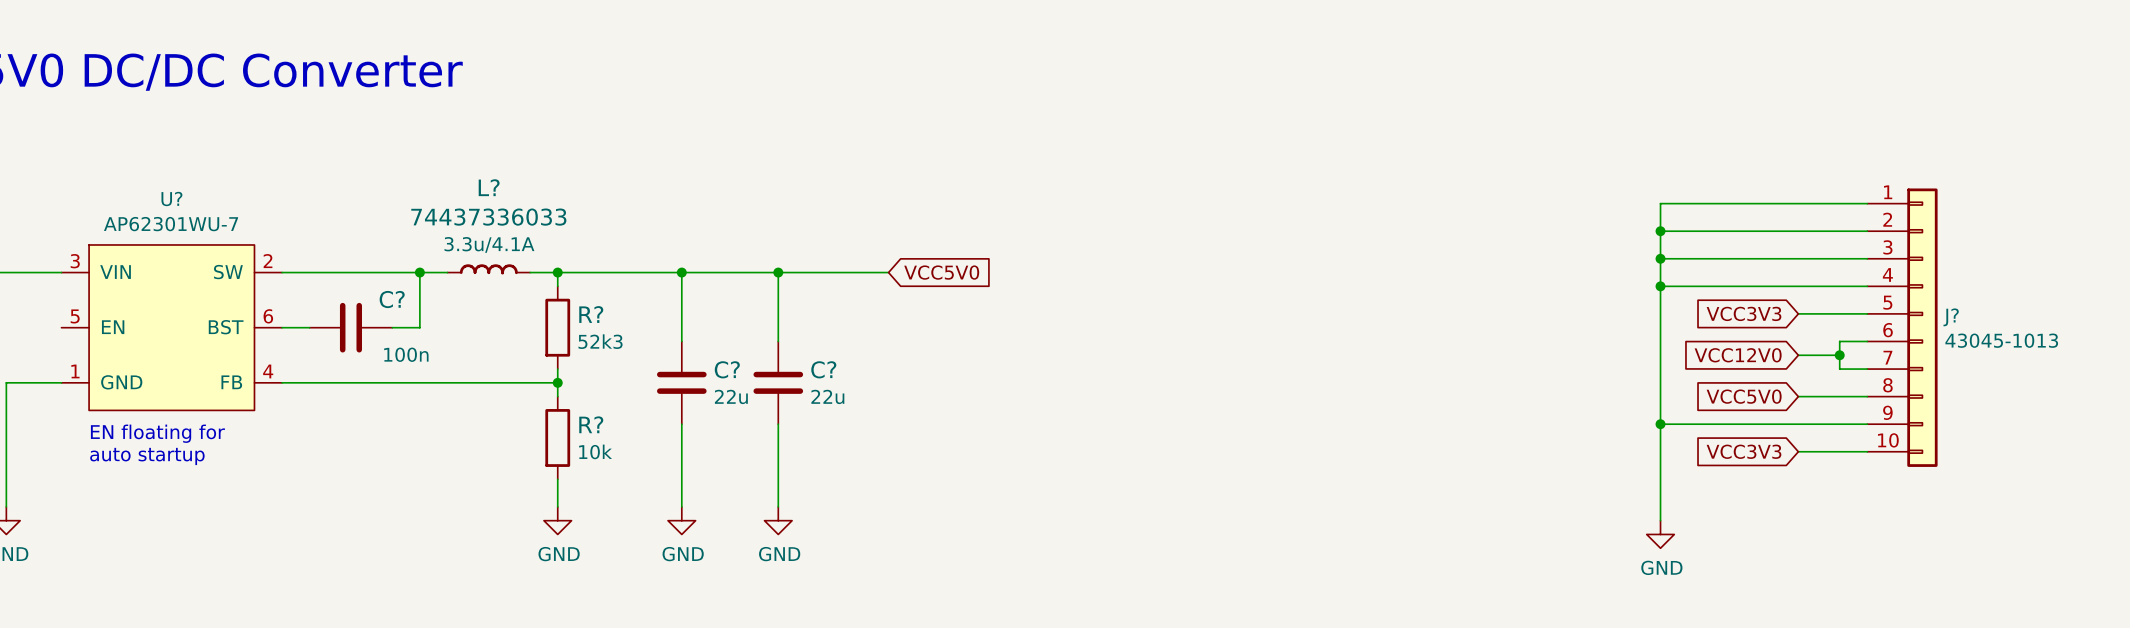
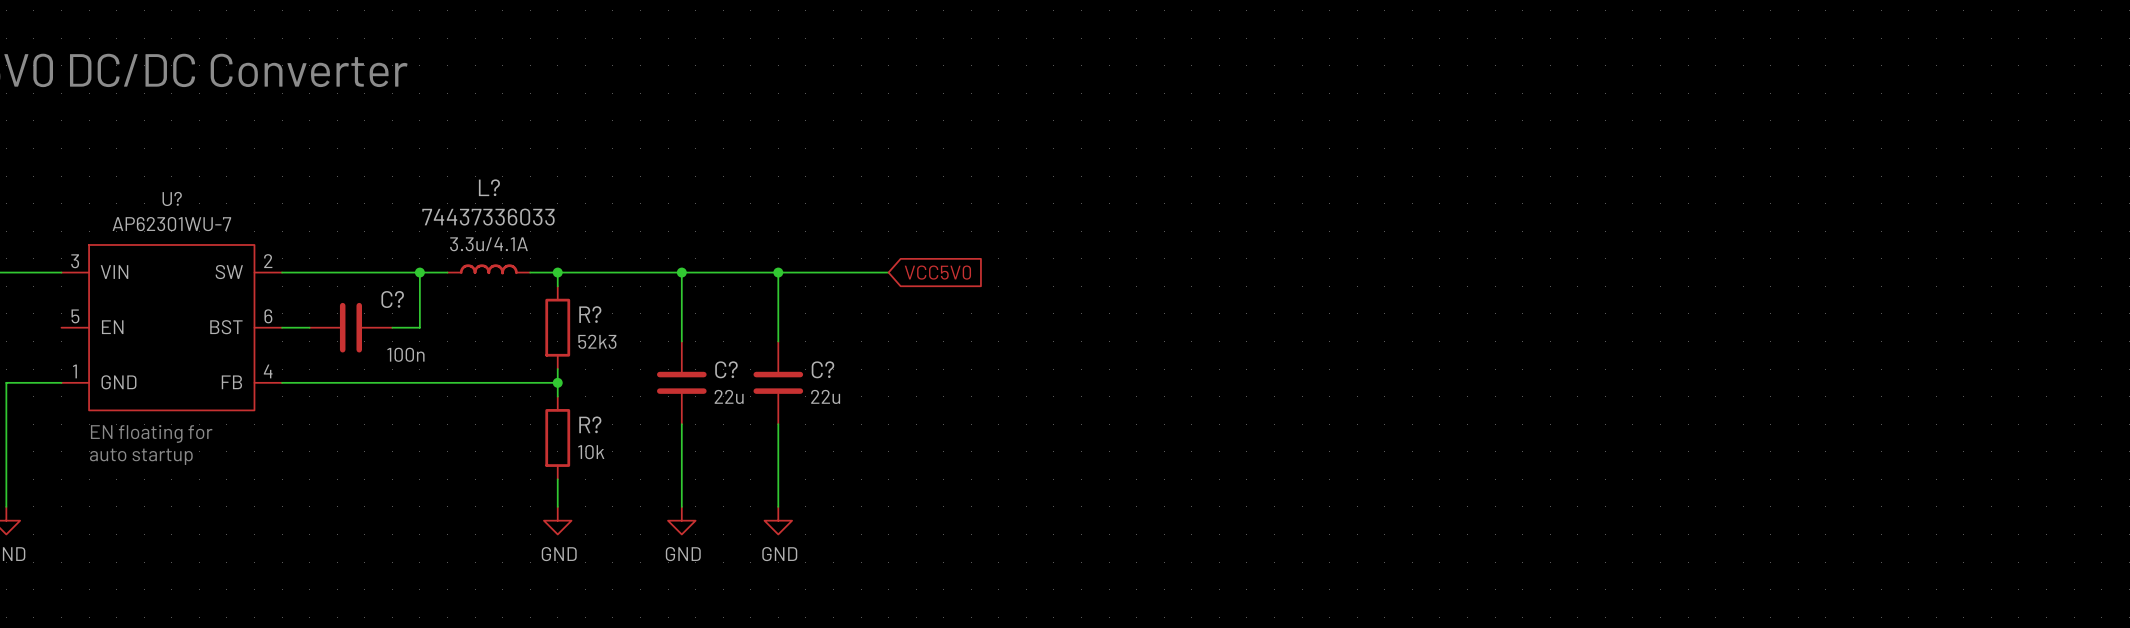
wire: (1867, 203) (1660, 203) (1660, 520) -> none
wire: (1660, 231) (1867, 231) -> none
junction: (1660, 231) -> none
wire: (1660, 258) (1867, 258) -> none
junction: (1660, 258) -> none
wire: (1660, 286) (1867, 286) -> none
junction: (1660, 286) -> none
global label: VCC3V3 (1744, 313) -> none
wire: (1798, 313) (1867, 313) -> none
J?: 43045-1013 (1902, 327) -> none
wire: (1867, 341) (1839, 341) (1839, 369) (1867, 369) -> none
global label: VCC12V0 (1738, 355) -> none
wire: (1798, 355) (1839, 355) -> none
junction: (1839, 355) -> none
global label: VCC5V0 (1744, 396) -> none
wire: (1798, 396) (1867, 396) -> none
wire: (1660, 424) (1867, 424) -> none
junction: (1660, 424) -> none
global label: VCC3V3 (1744, 451) -> none
wire: (1798, 451) (1867, 451) -> none
power symbol: GND (1660, 534) -> none

